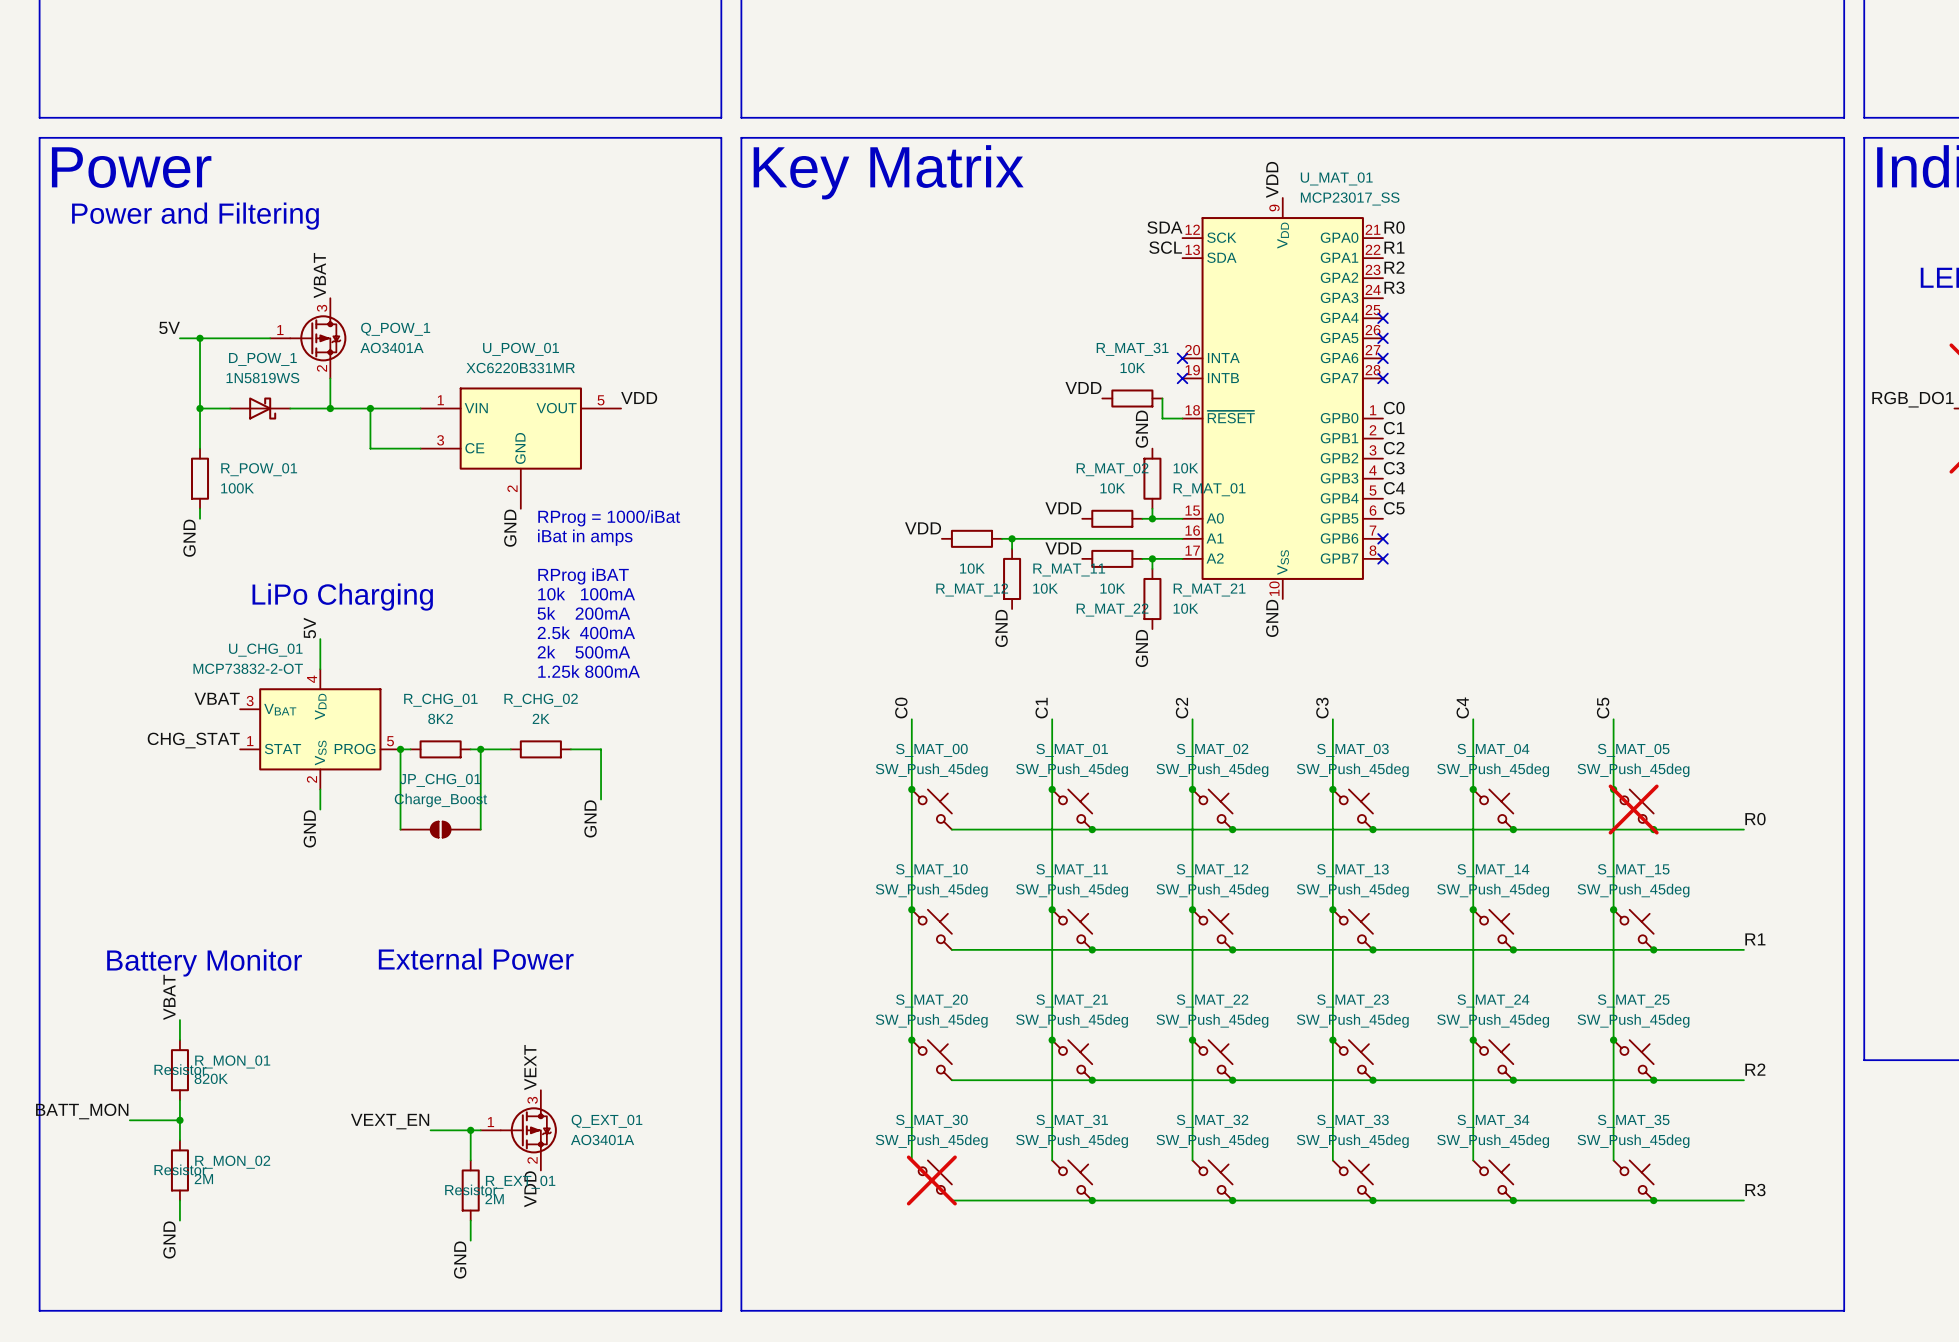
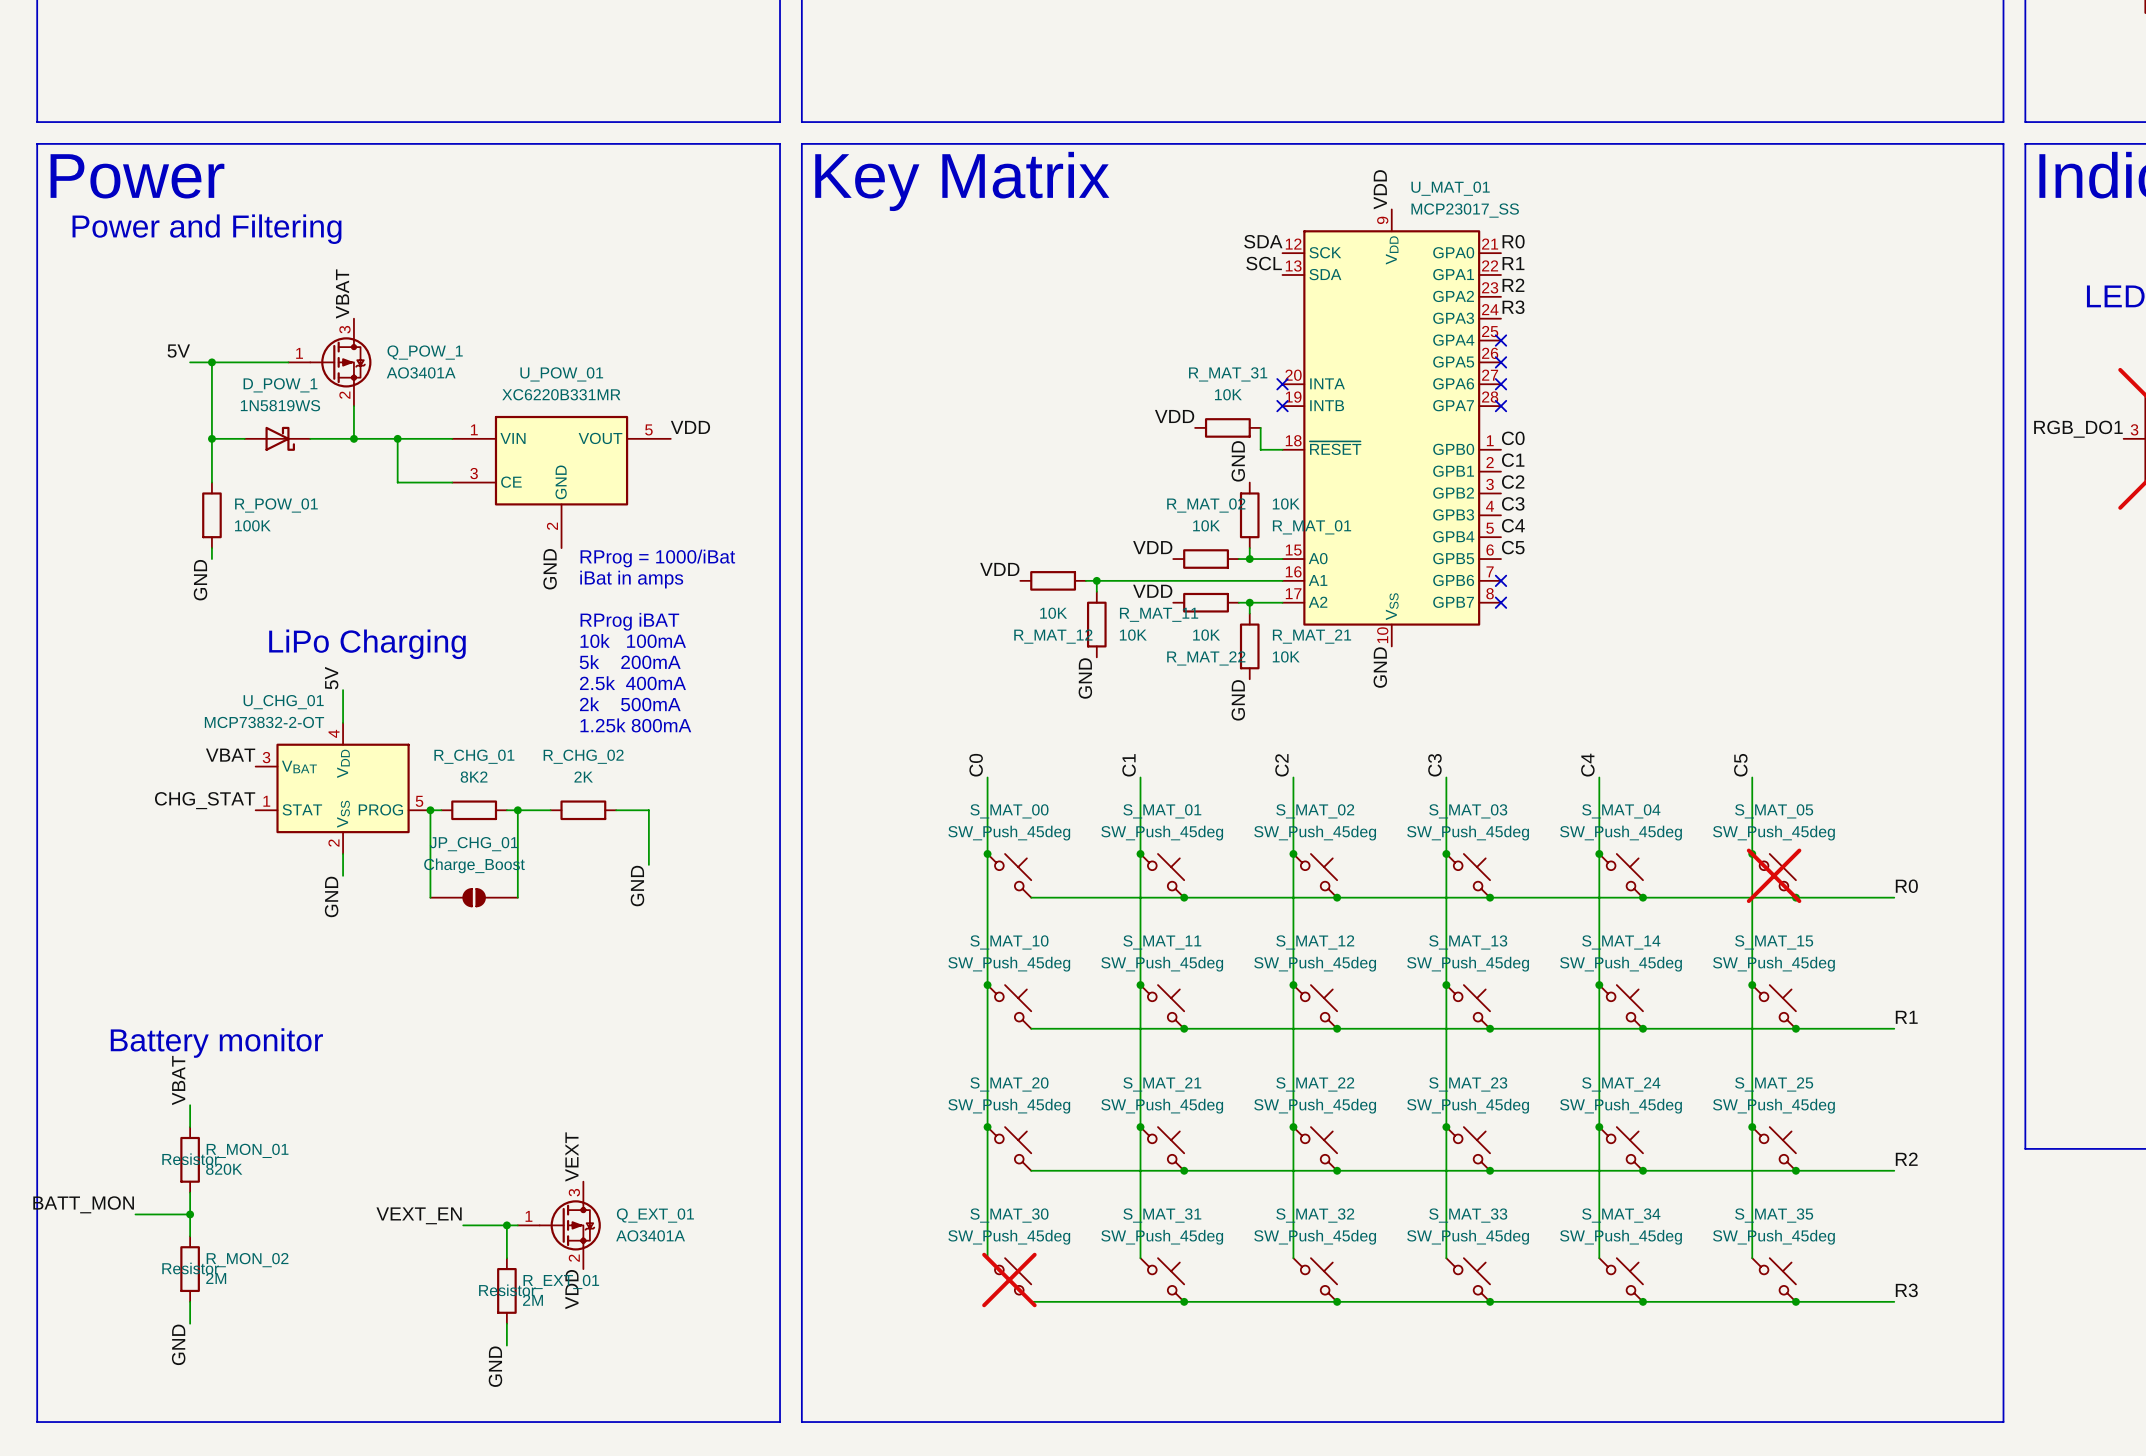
text: External Power (476, 959) -> none
text: Battery Monitor (204, 962) -> Battery monitor (216, 1043)

